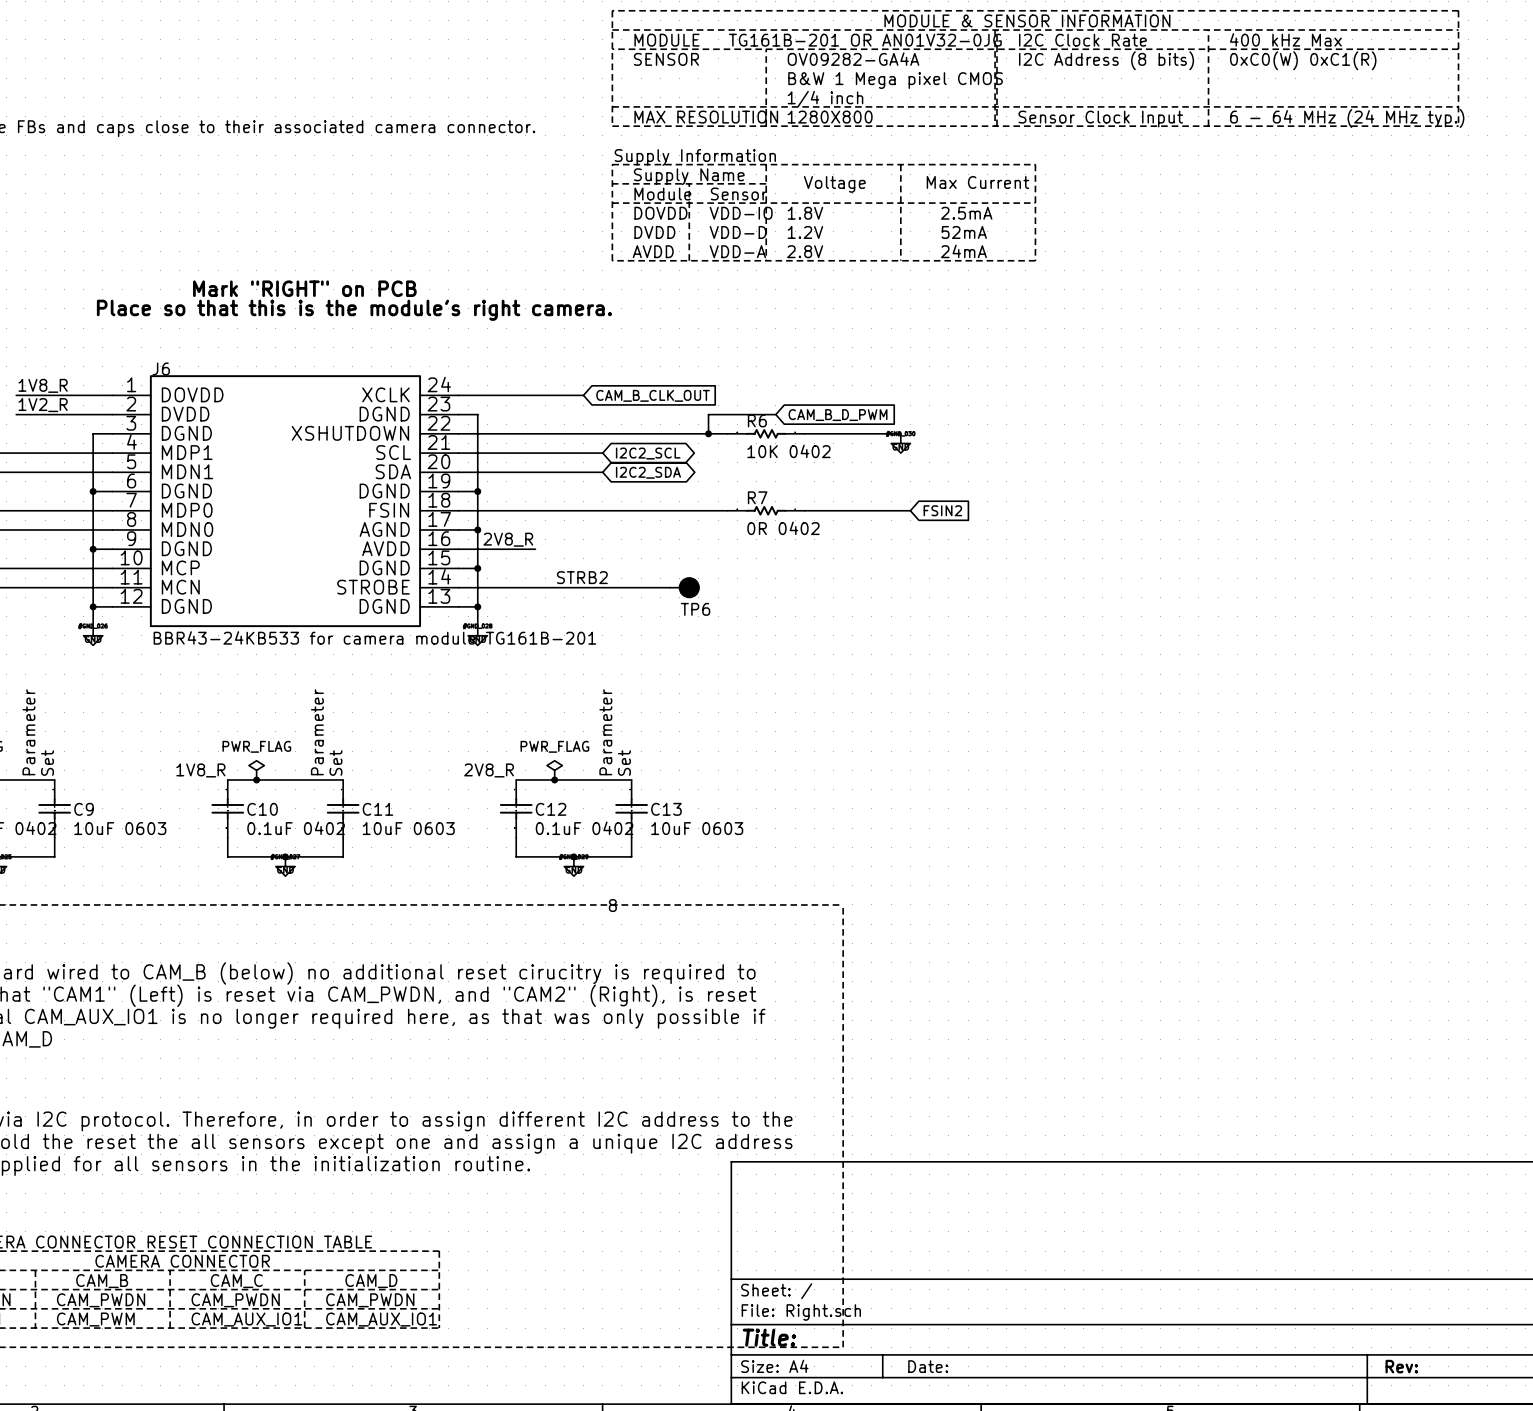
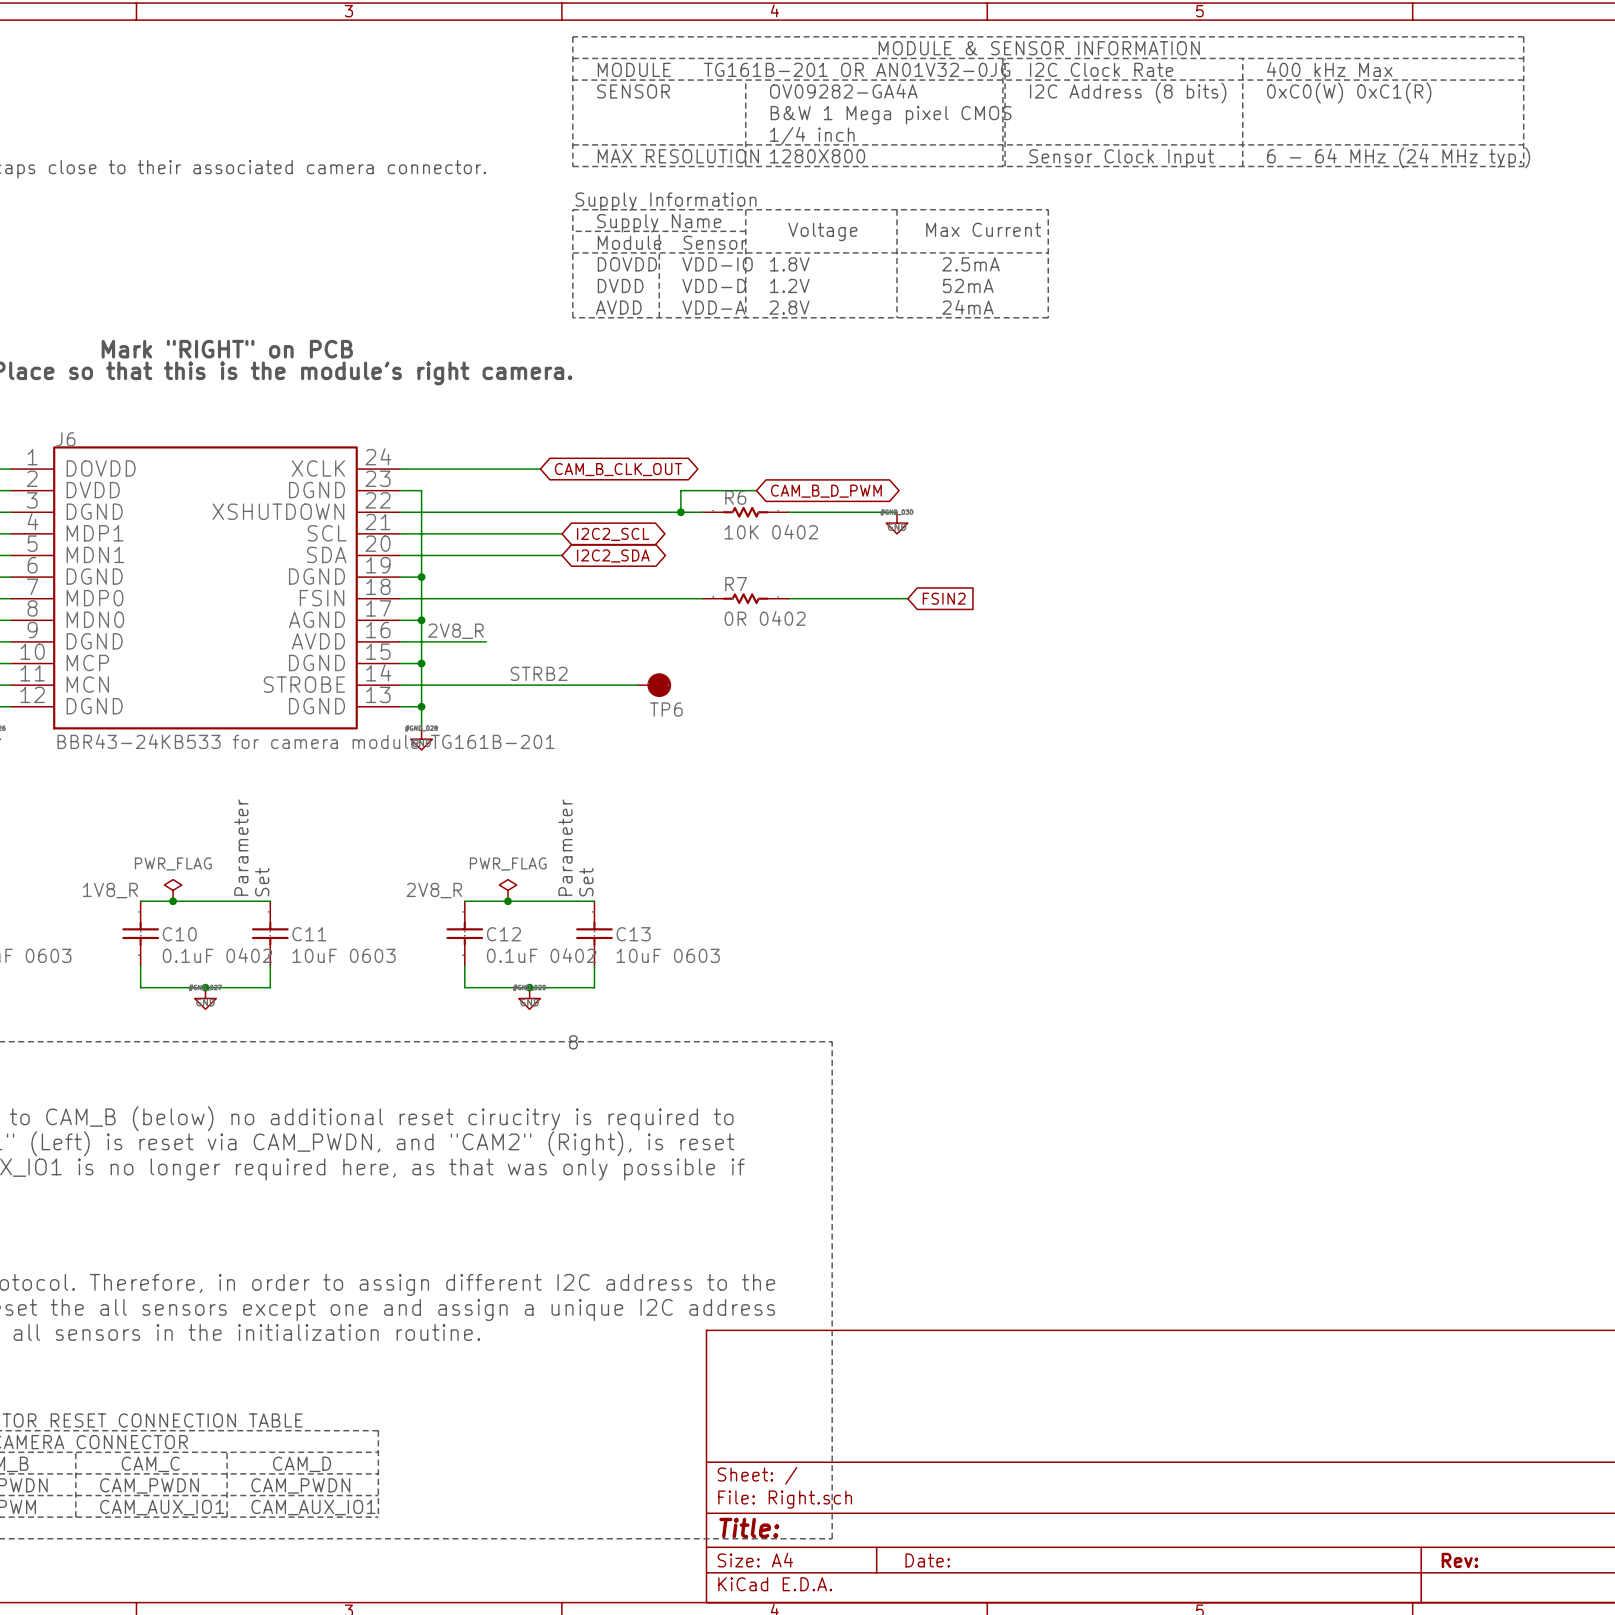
global label shape: input (653, 395) -> bidirectional (618, 469)
global label shape: input (838, 415) -> bidirectional (826, 491)

